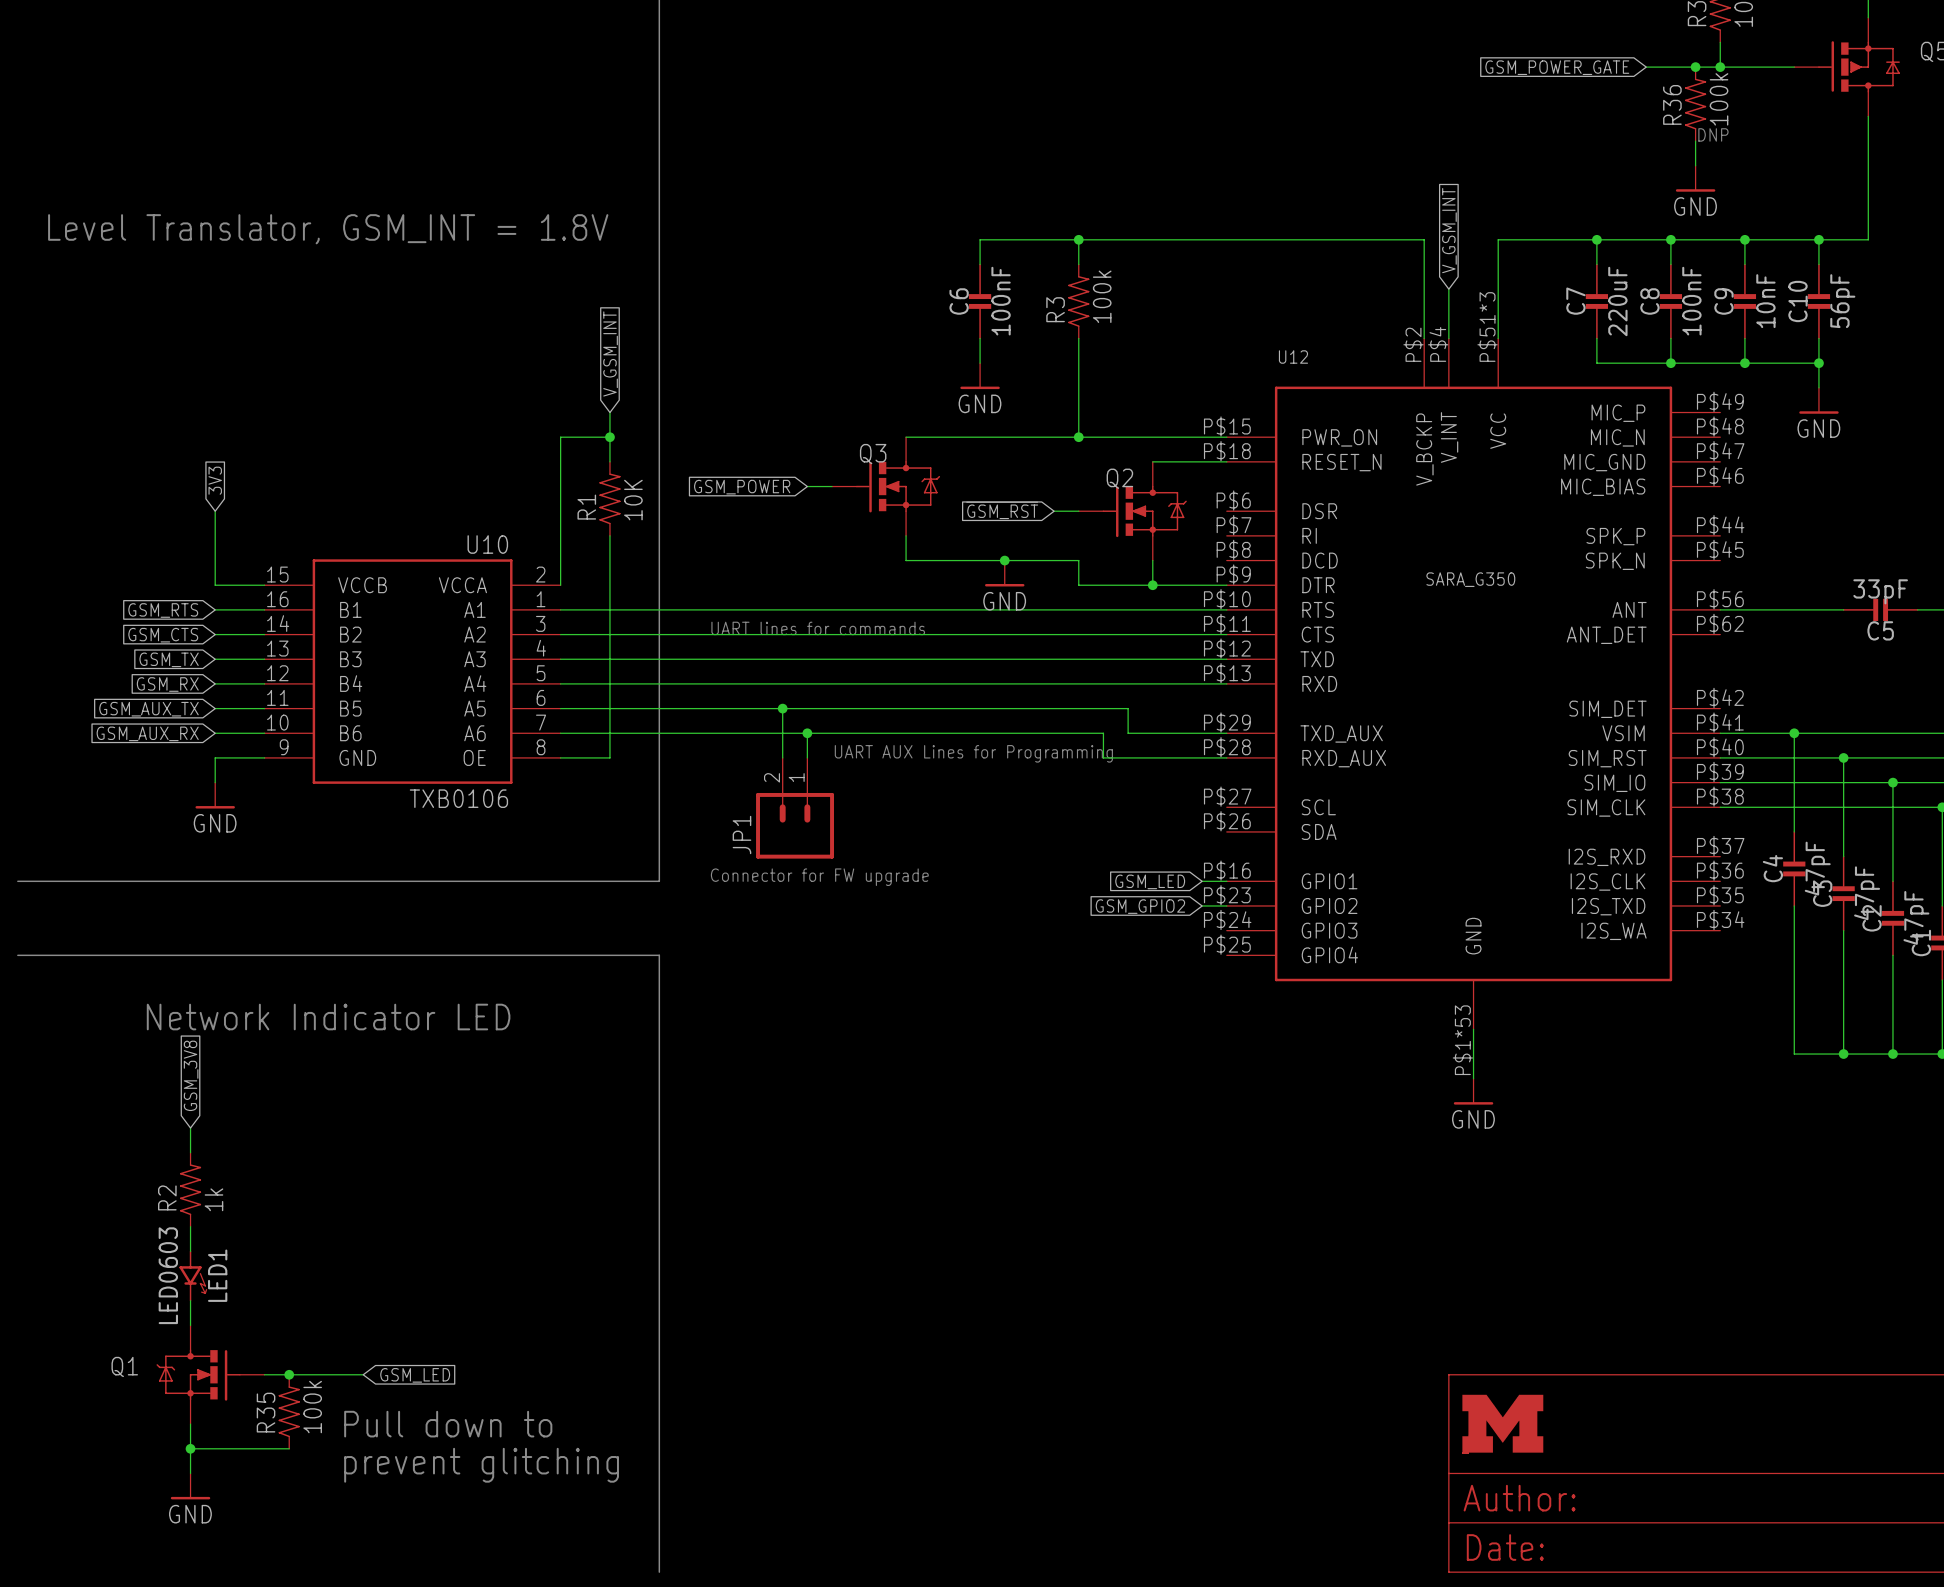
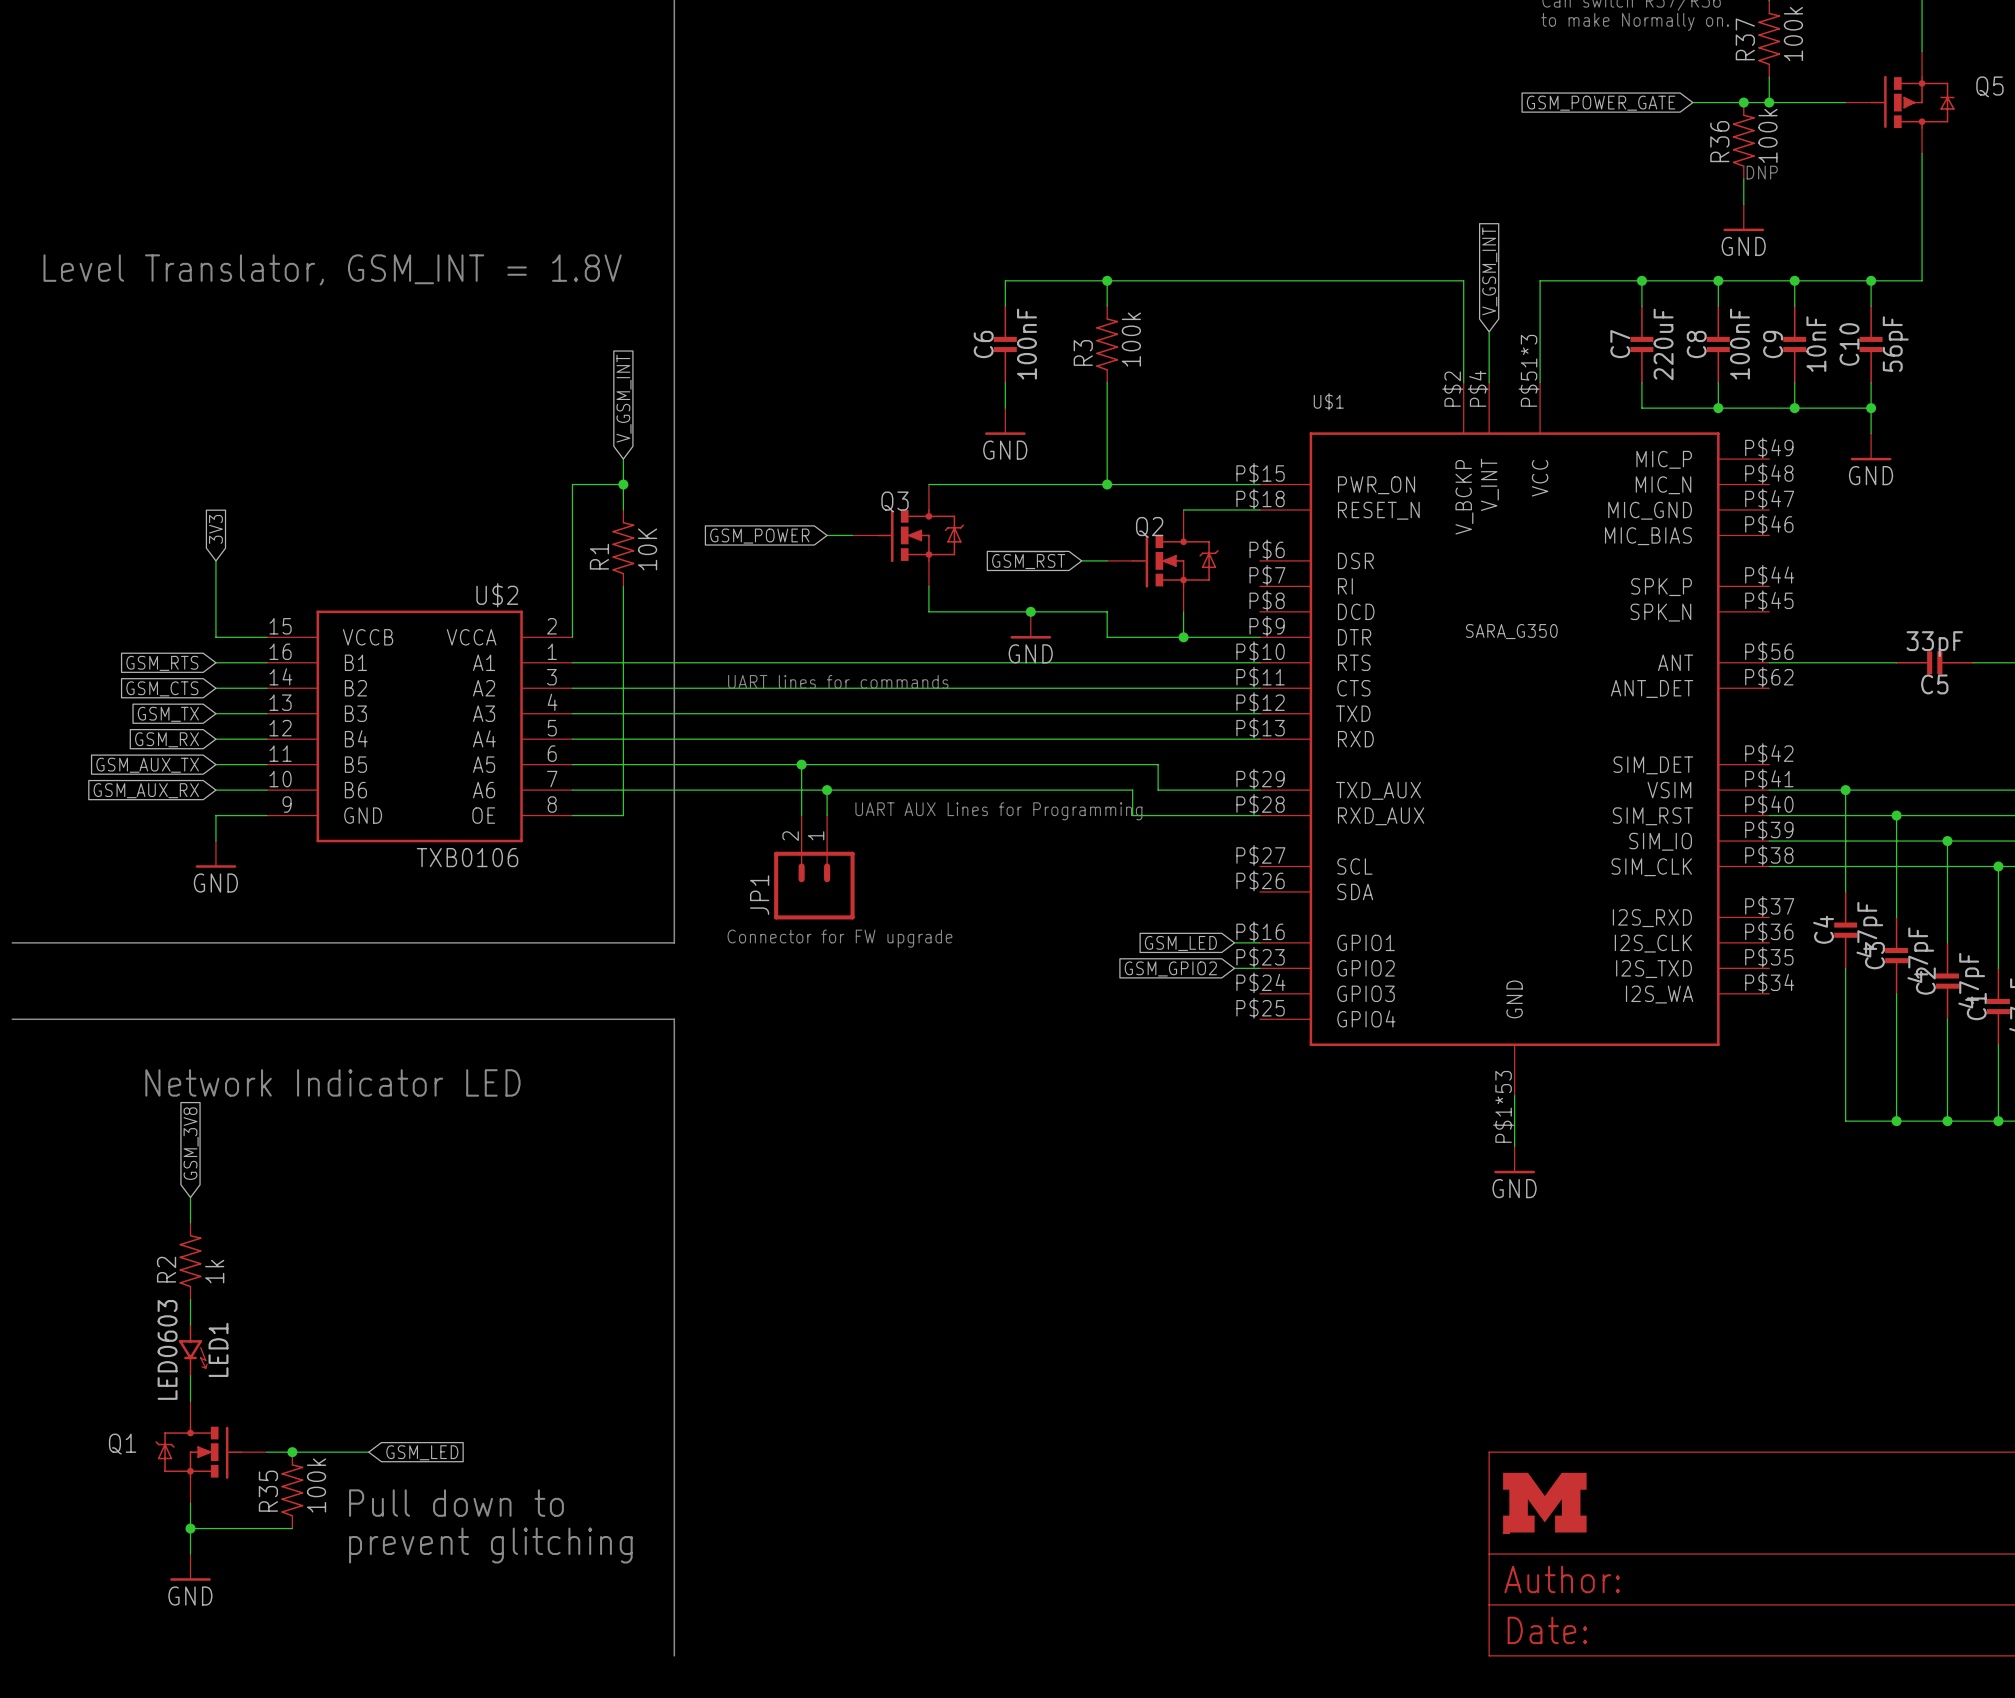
U12 name: U12 (1293, 357) -> U$1 (1328, 401)
U10 name: U10 (487, 544) -> U$2 (497, 595)

